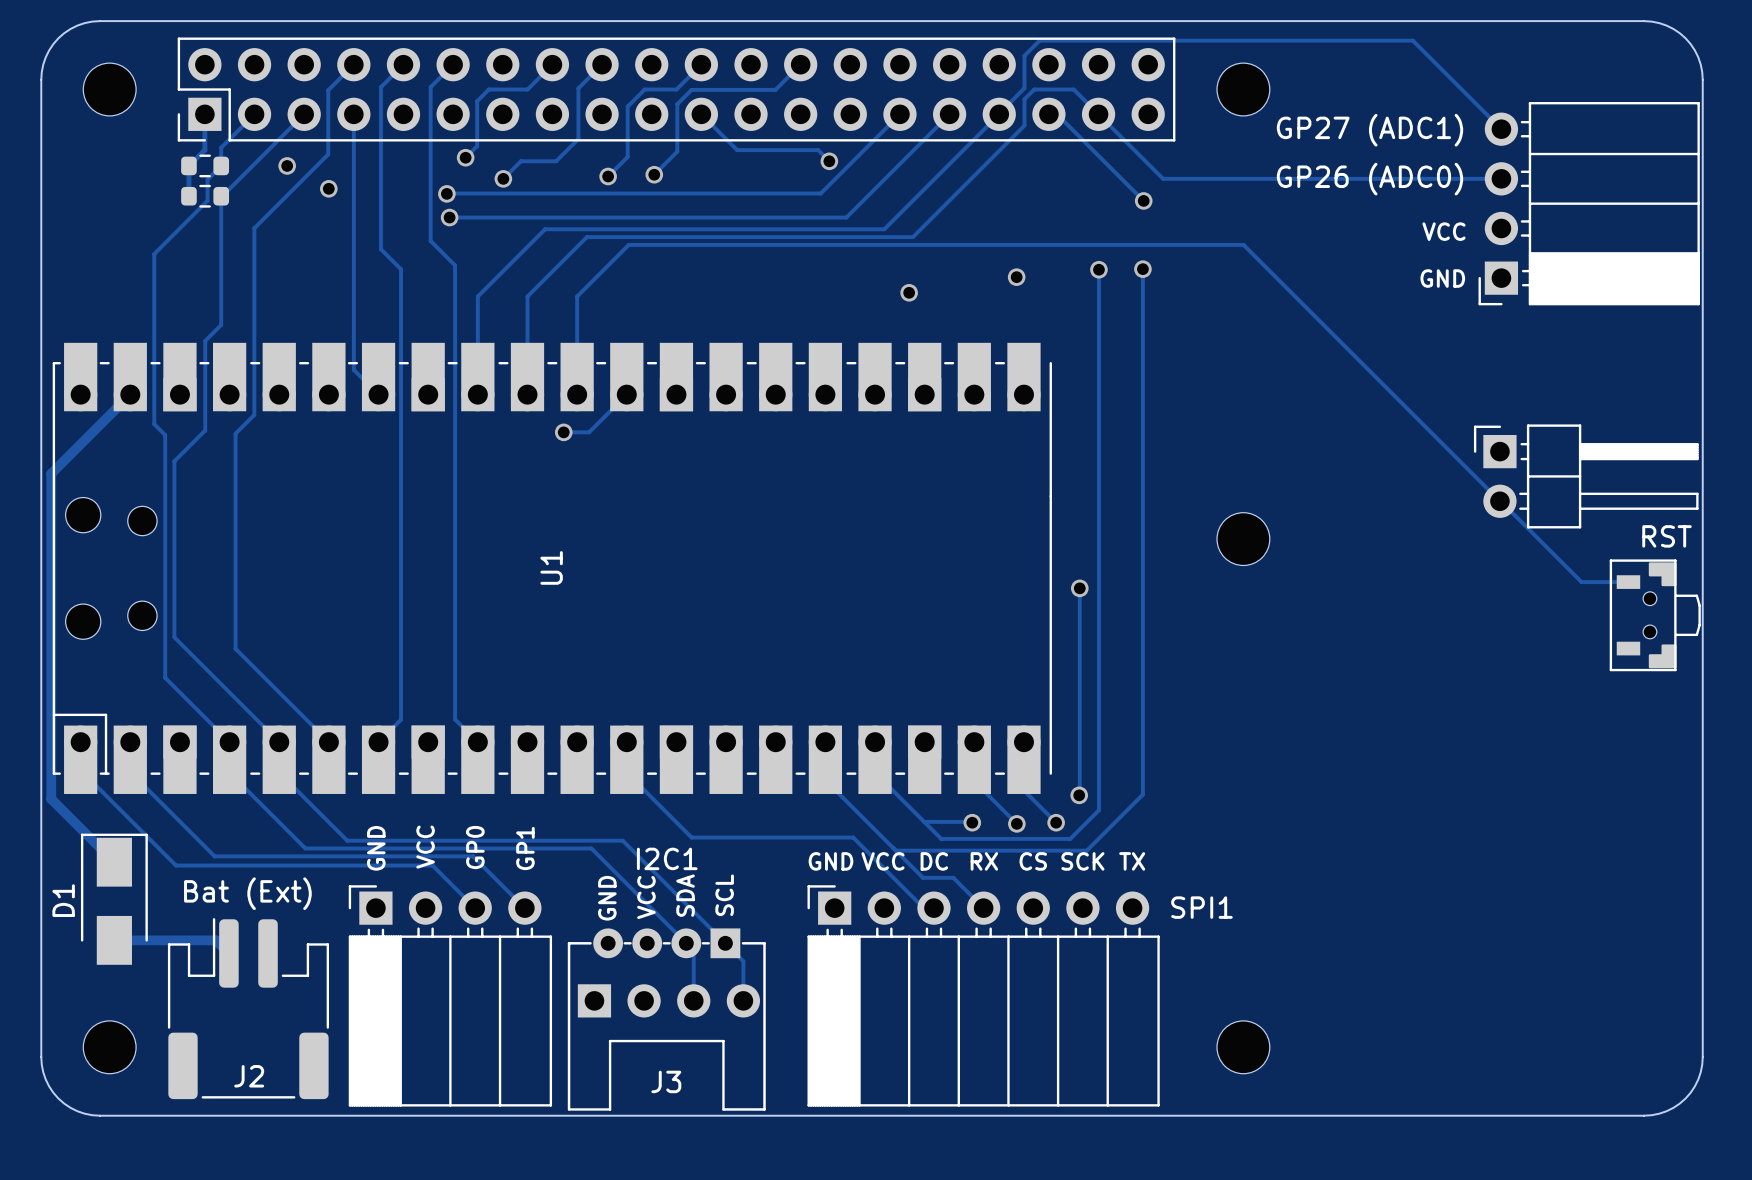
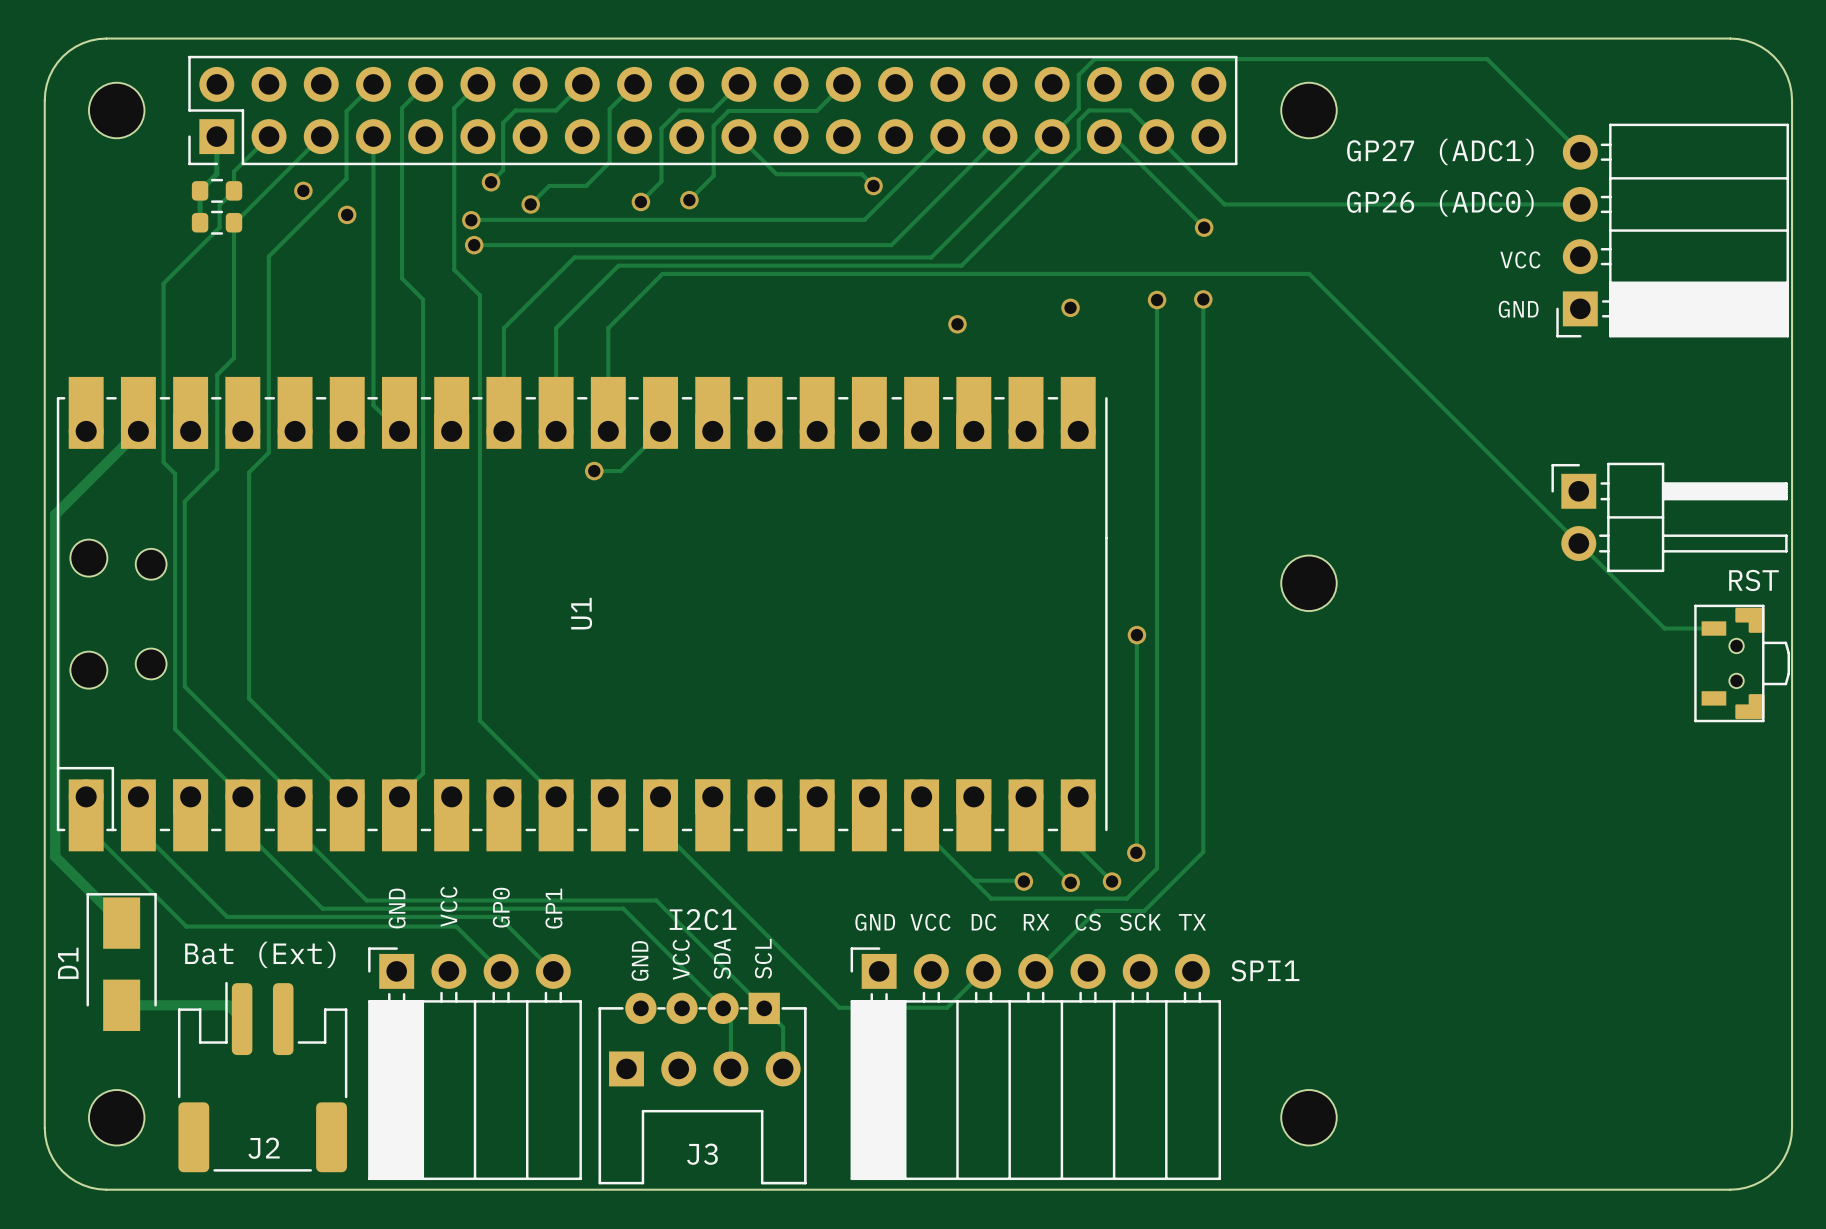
track: (455, 669) (455, 719) (477, 742) -> (479, 720) (556, 796)
track: (825, 749) (825, 780) (923, 877) (953, 877) (983, 908) -> none
track: (691, 837) (853, 837) (923, 908) (933, 908) -> (728, 897) (839, 1007) (947, 1007) (983, 971)
track: (895, 850) (1041, 850) -> (1035, 971) (1096, 910)

